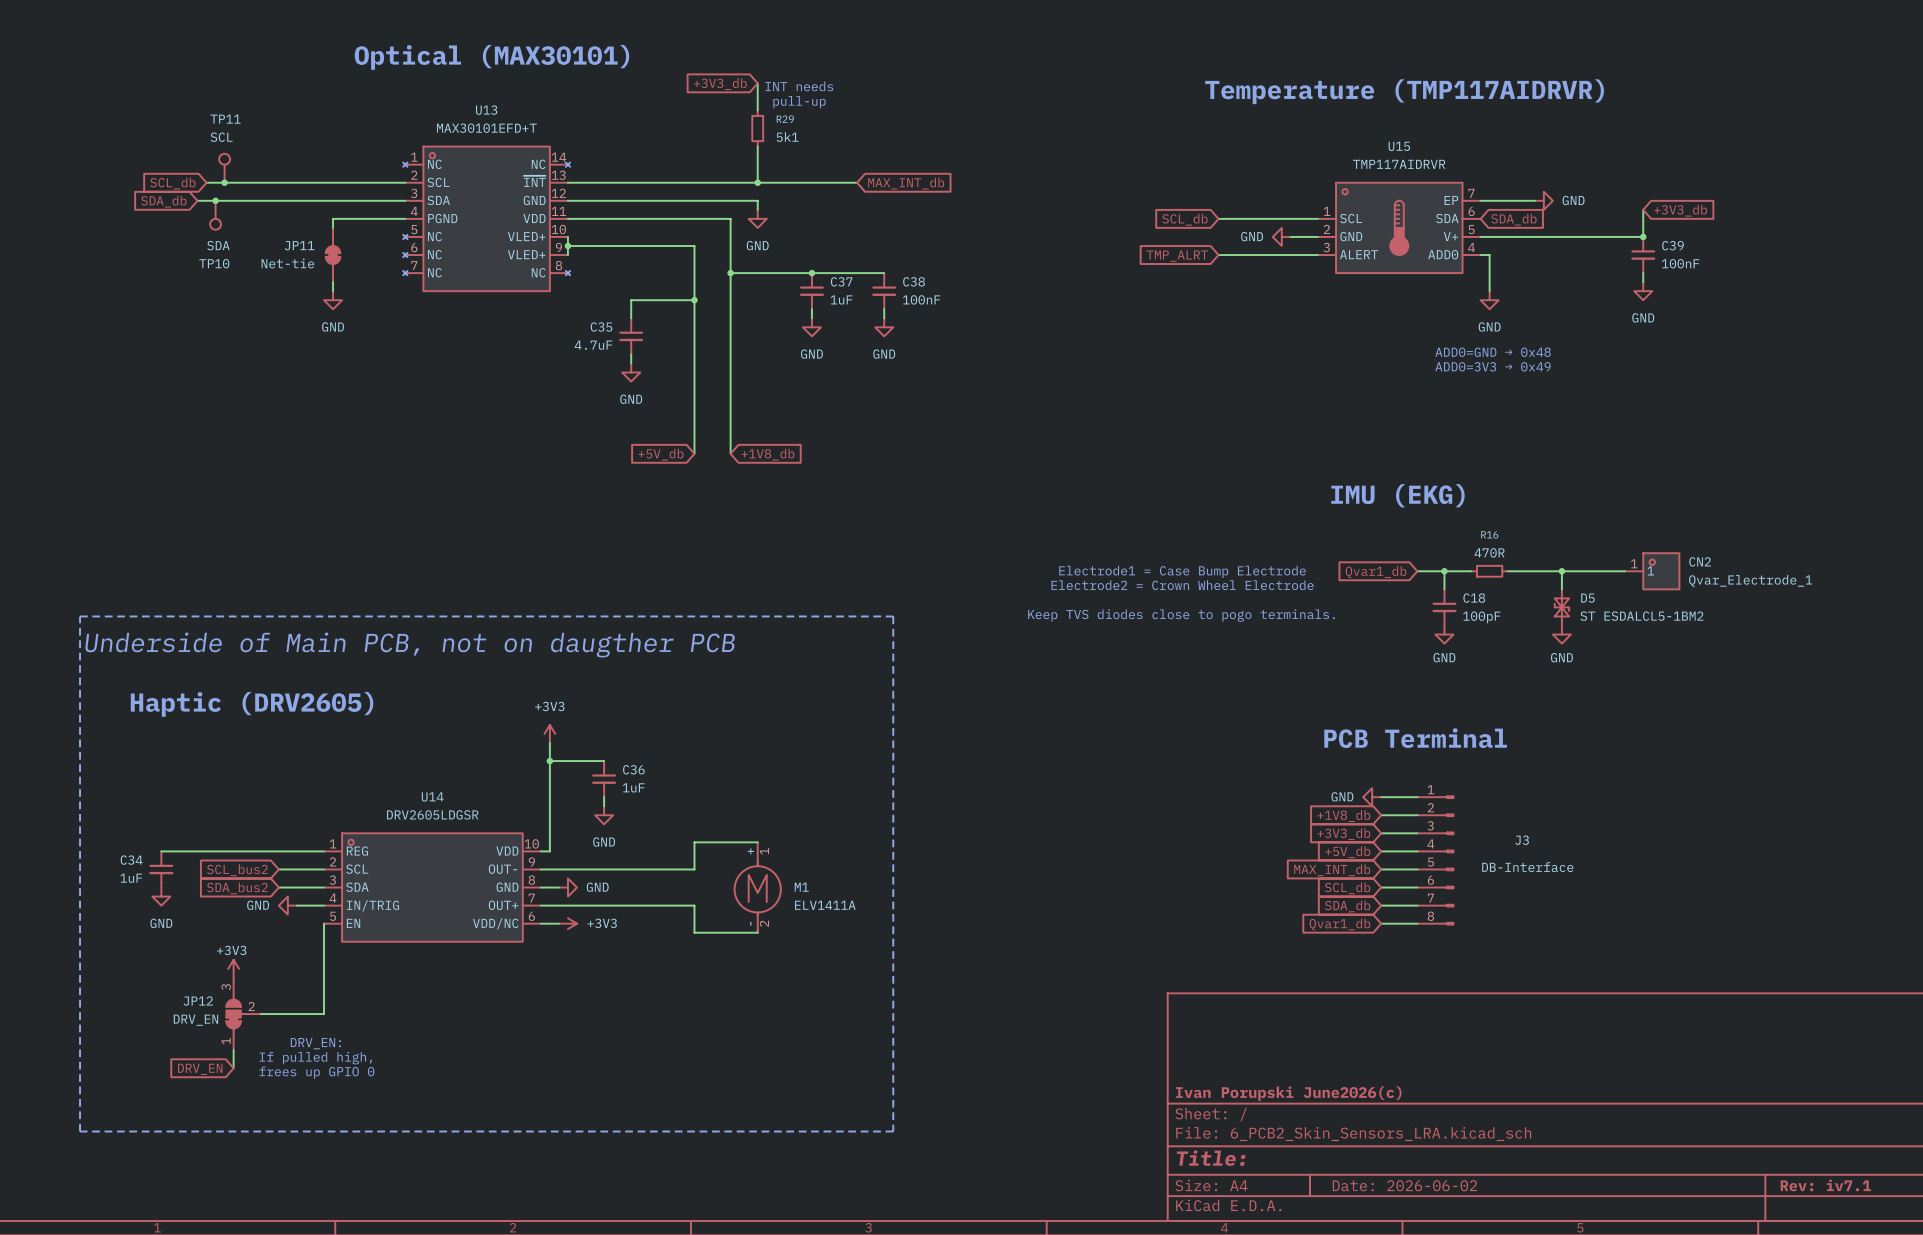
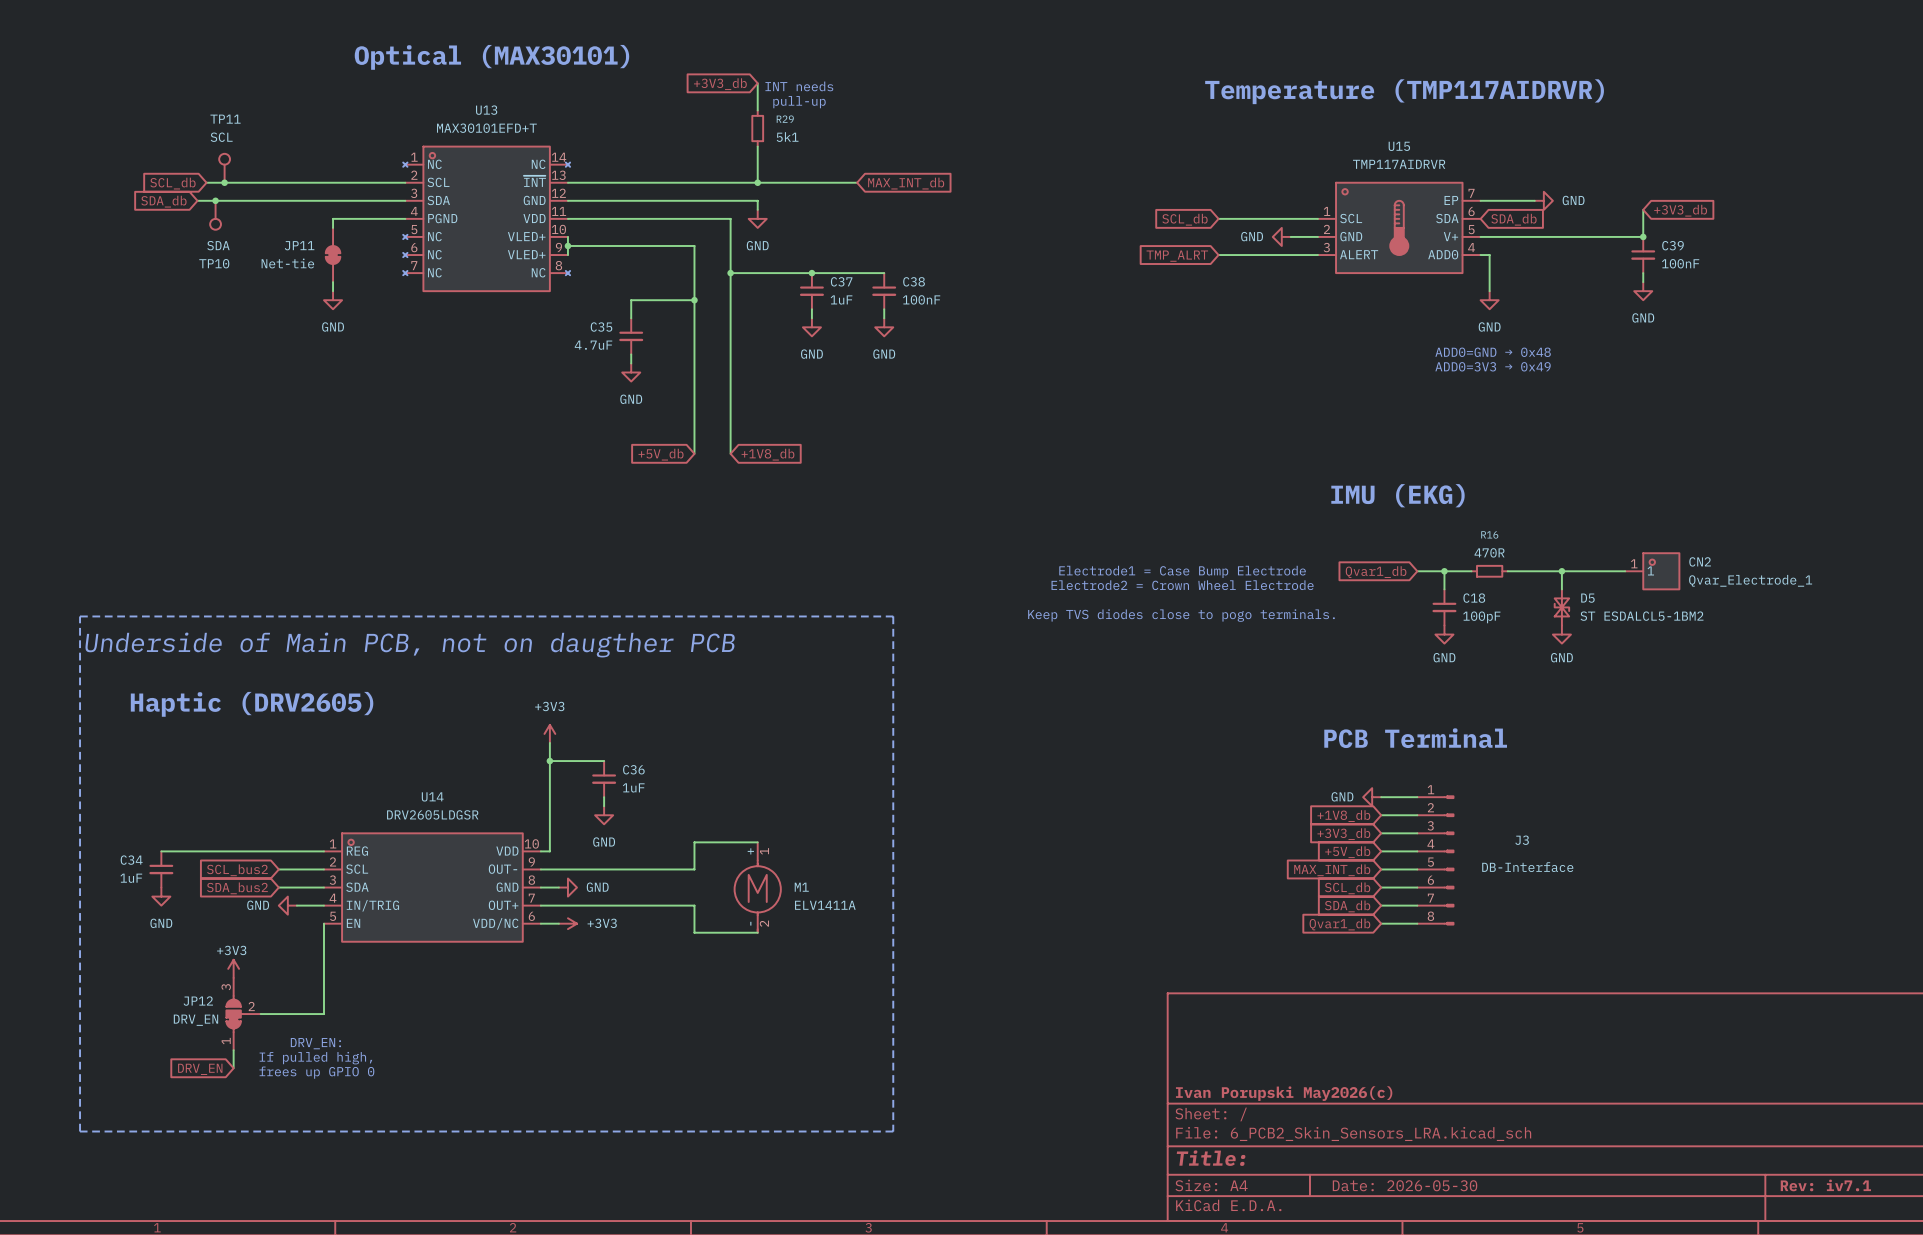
title block: Ivan Porupski June2026(c) (1288, 1093) -> Ivan Porupski May2026(c) (1284, 1093)
title block: Date: 2026-06-02 (1404, 1185) -> Date: 2026-05-30 (1405, 1185)

